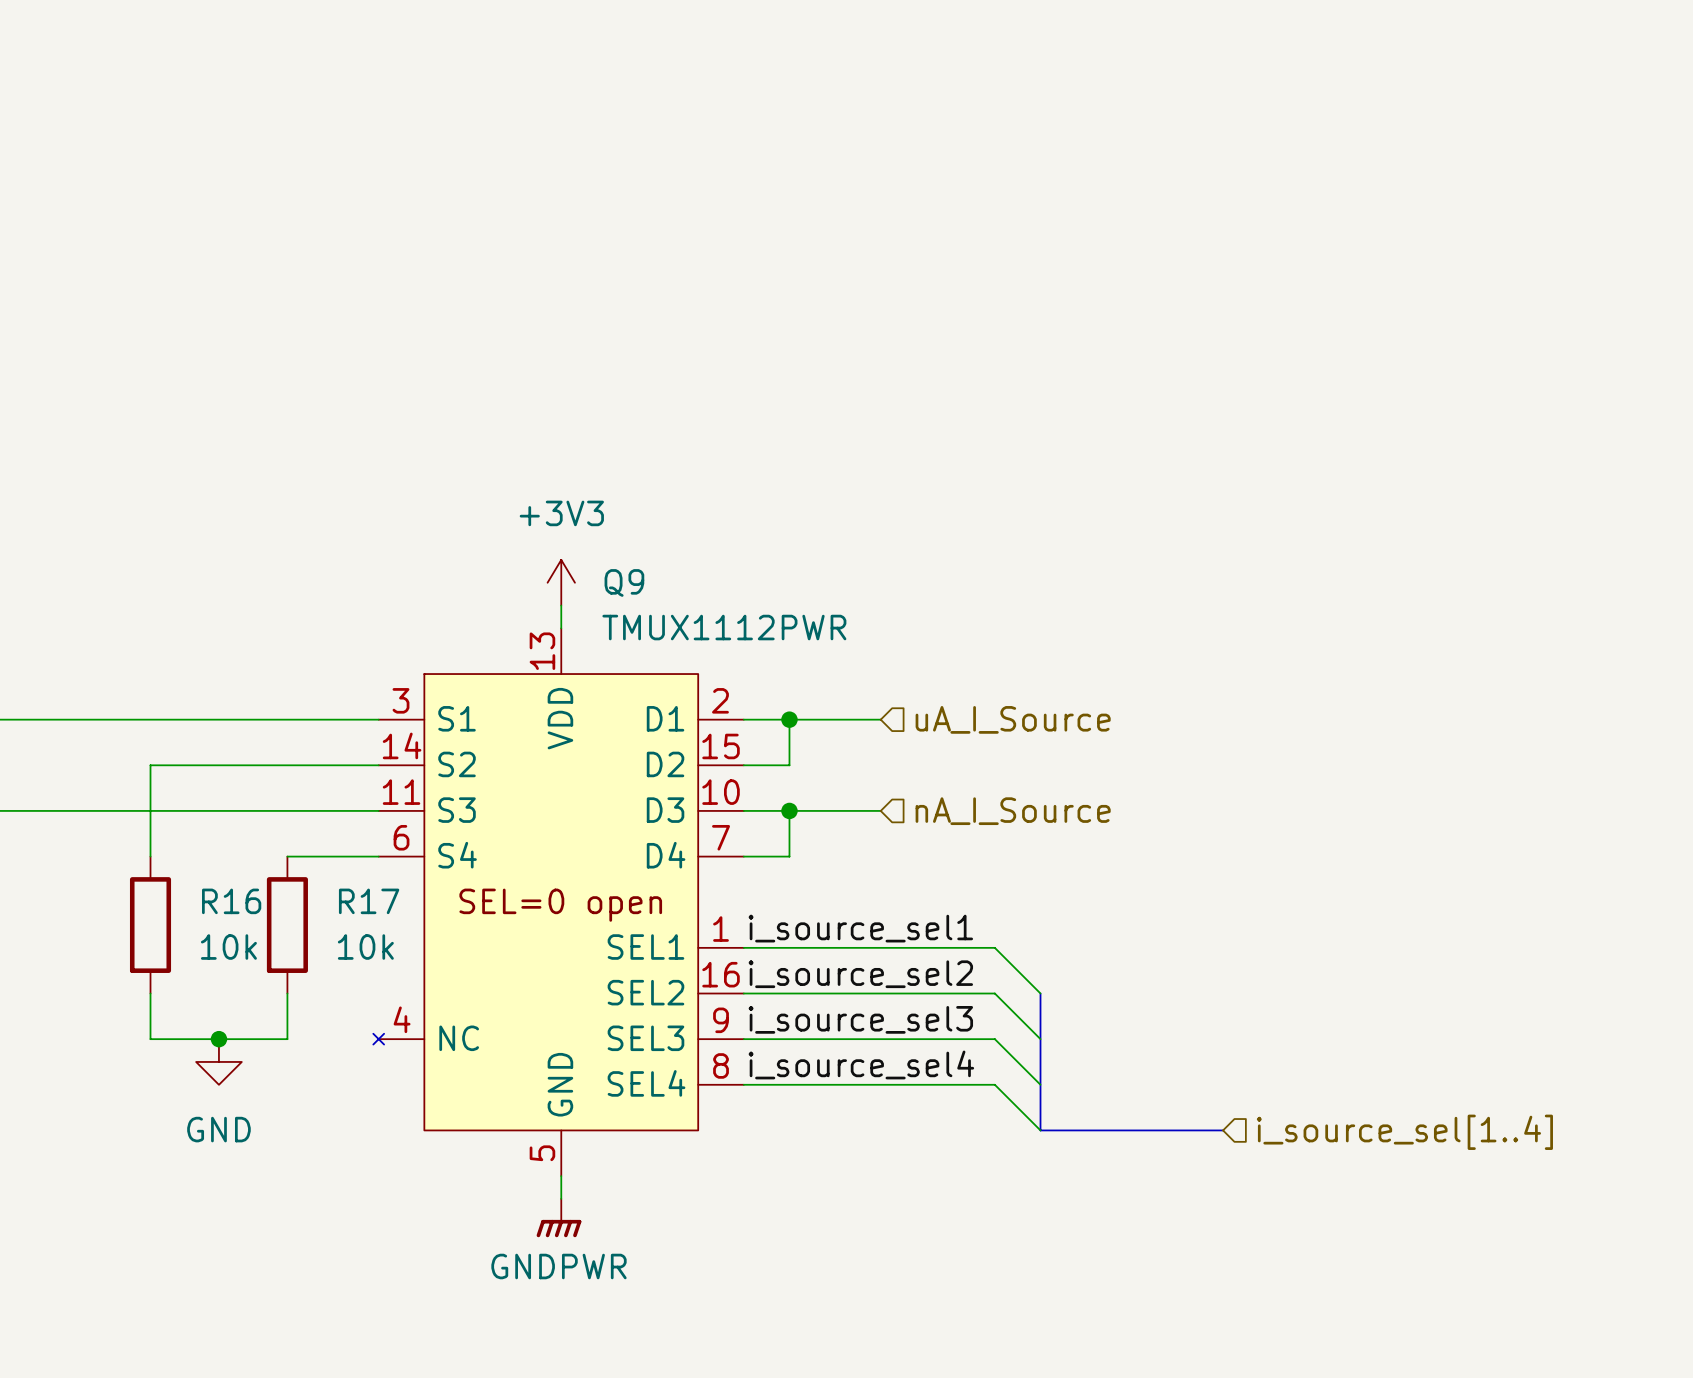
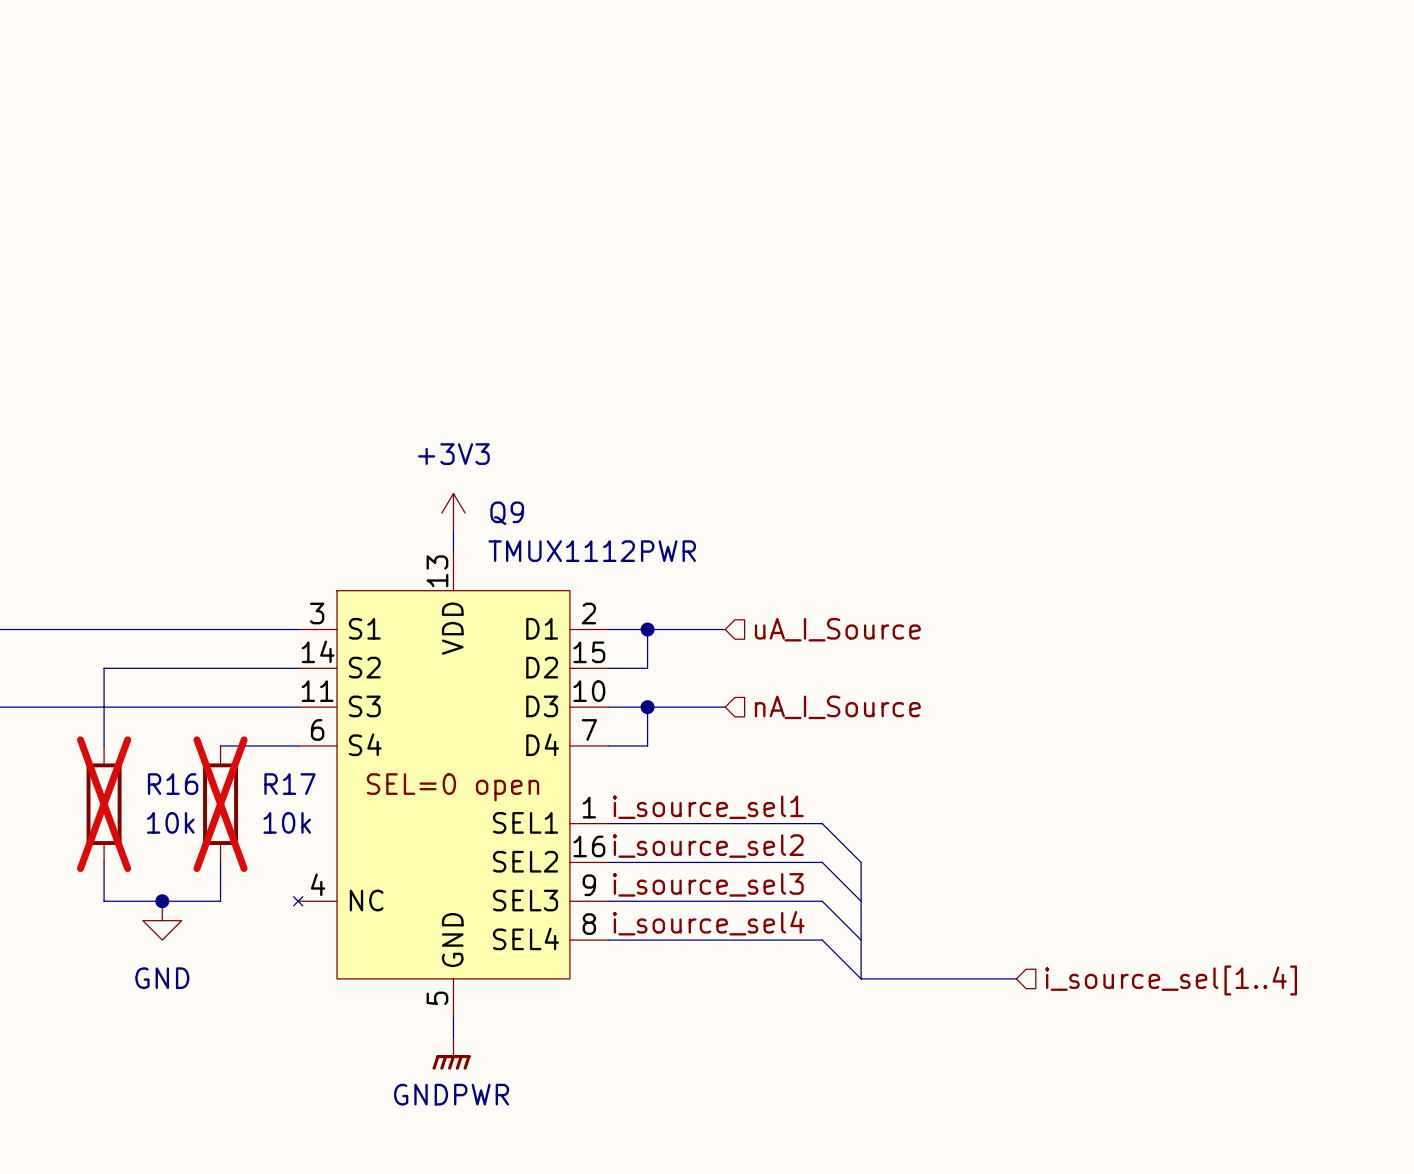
R16 do-not-place cross: none -> (104, 804)
R17 do-not-place cross: none -> (220, 804)

